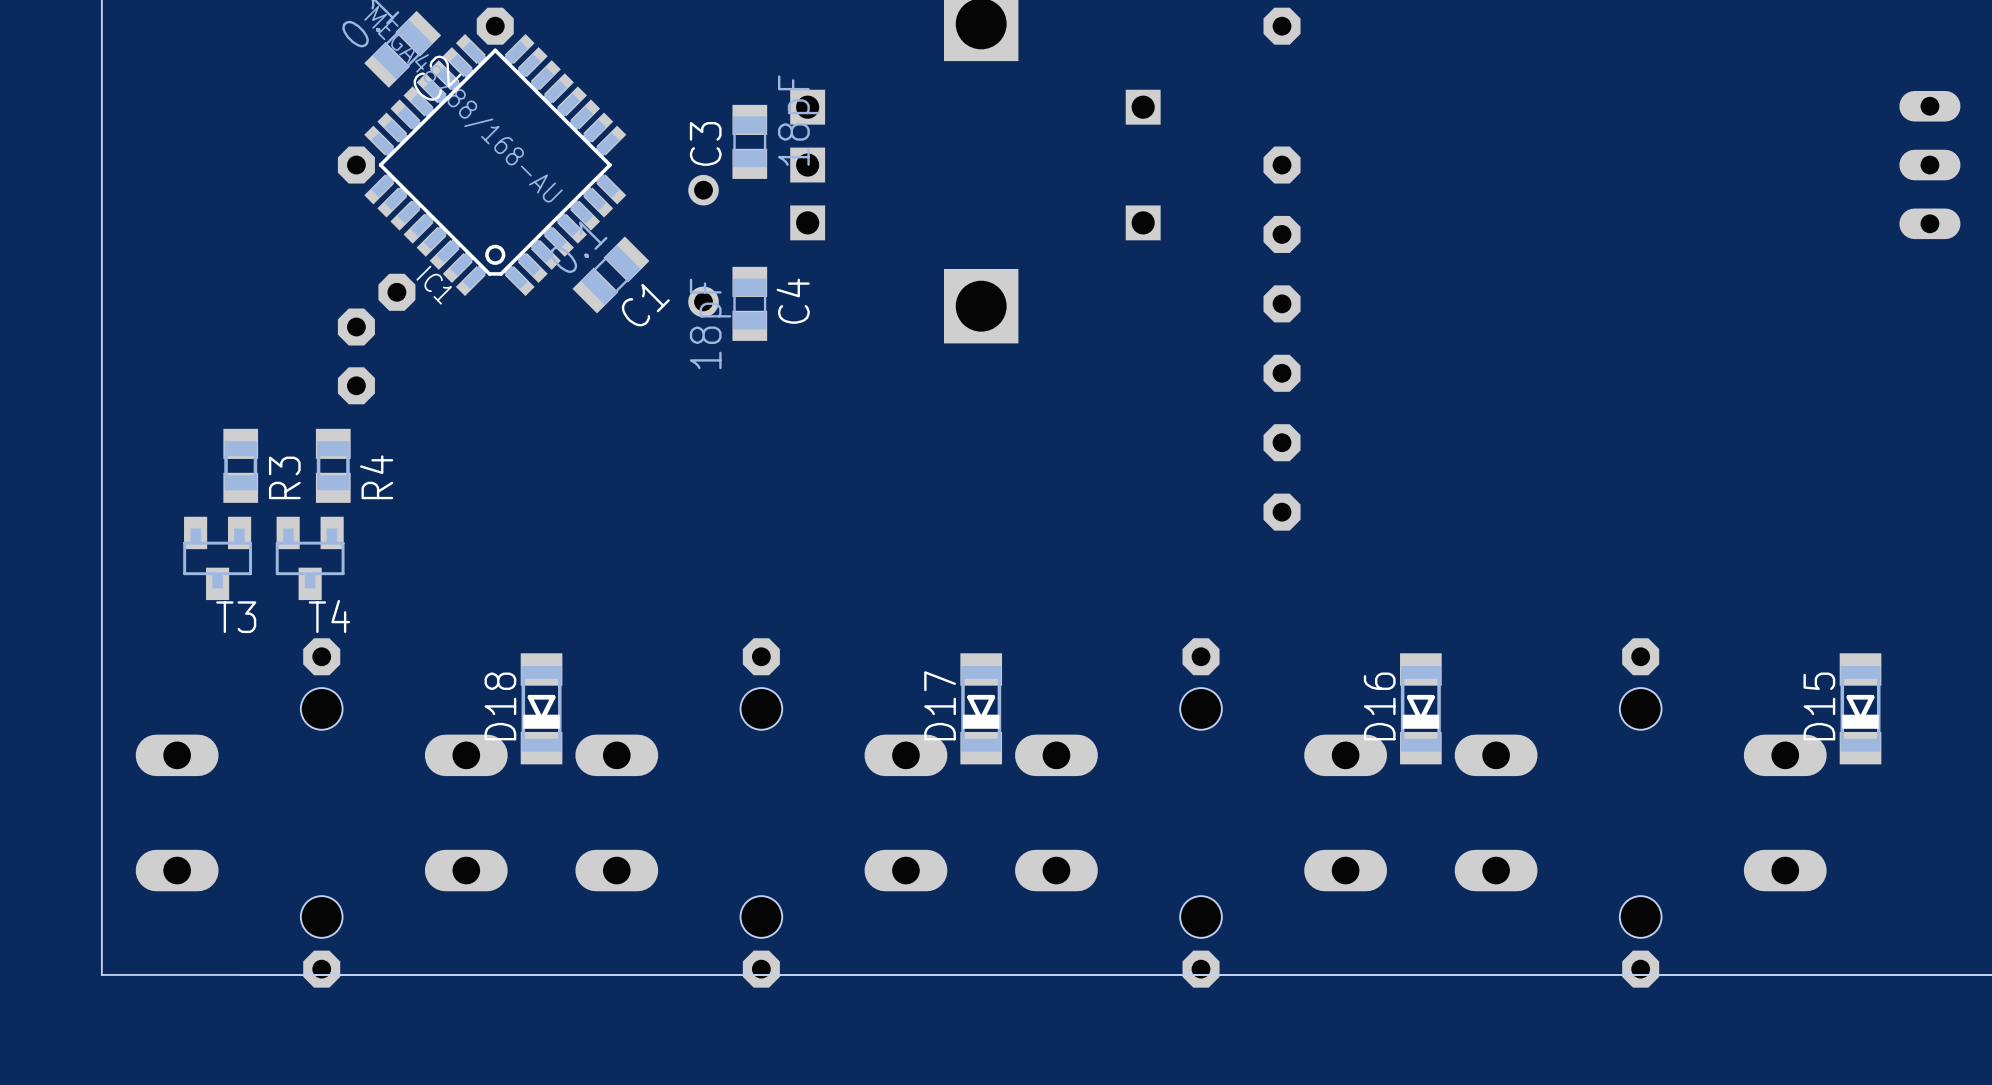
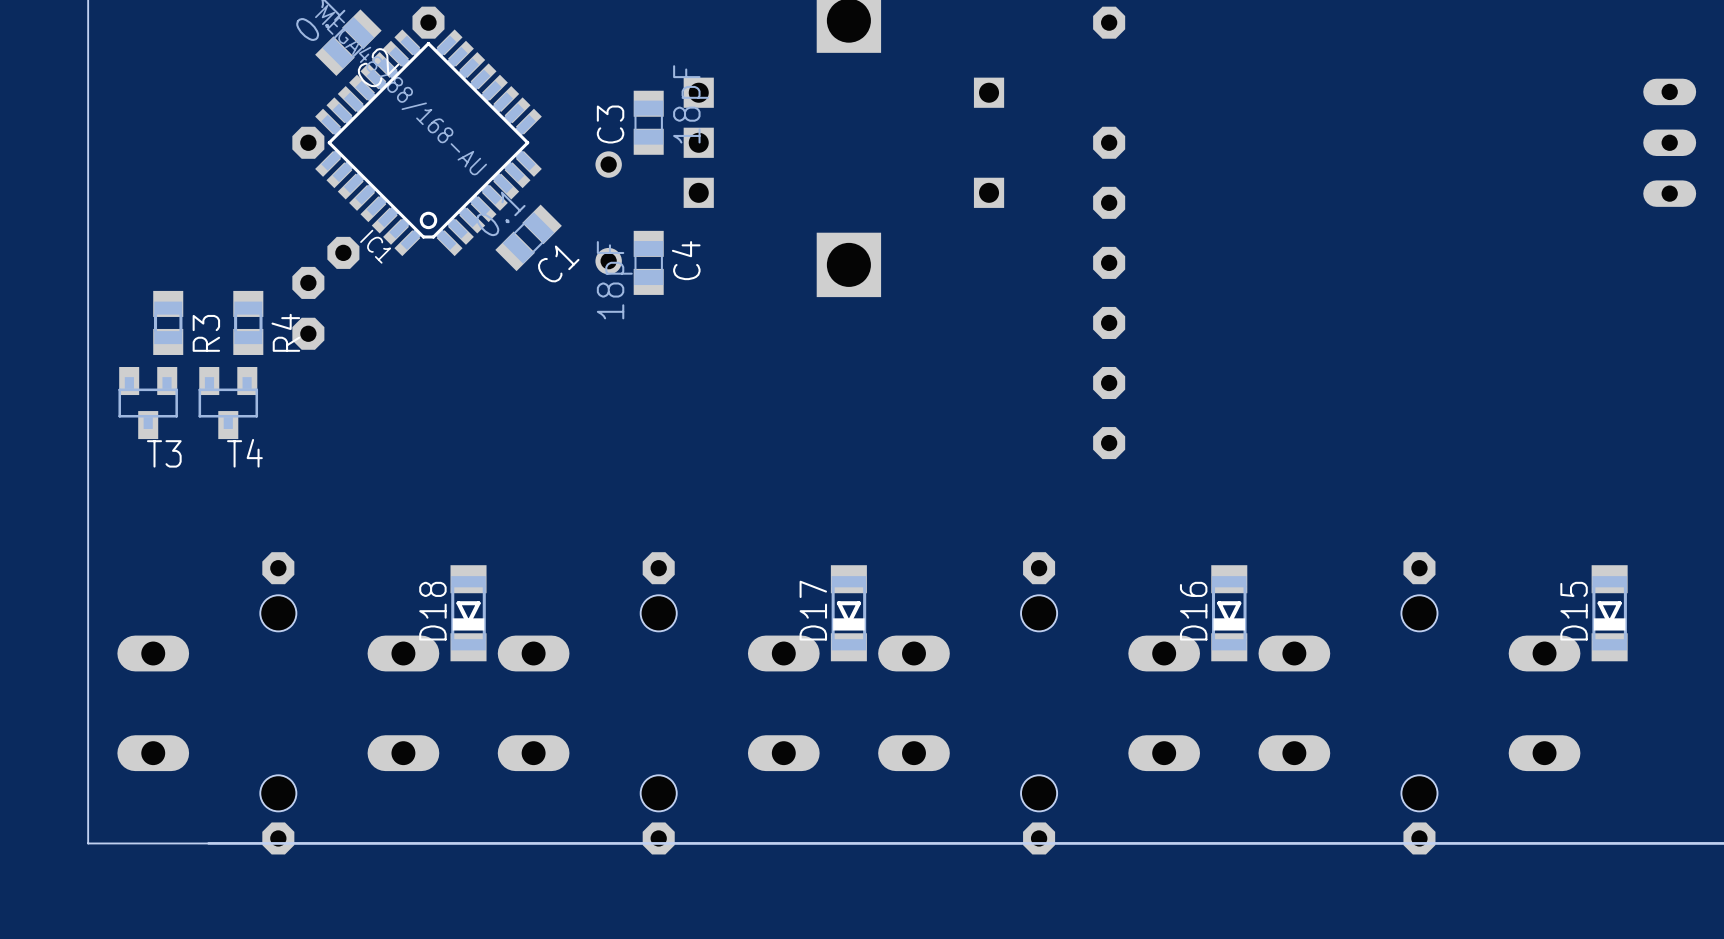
R3 position: (240, 465) -> (168, 322)
R4 position: (333, 465) -> (248, 322)
T3 position: (217, 558) -> (148, 403)
T4 position: (310, 558) -> (228, 403)

